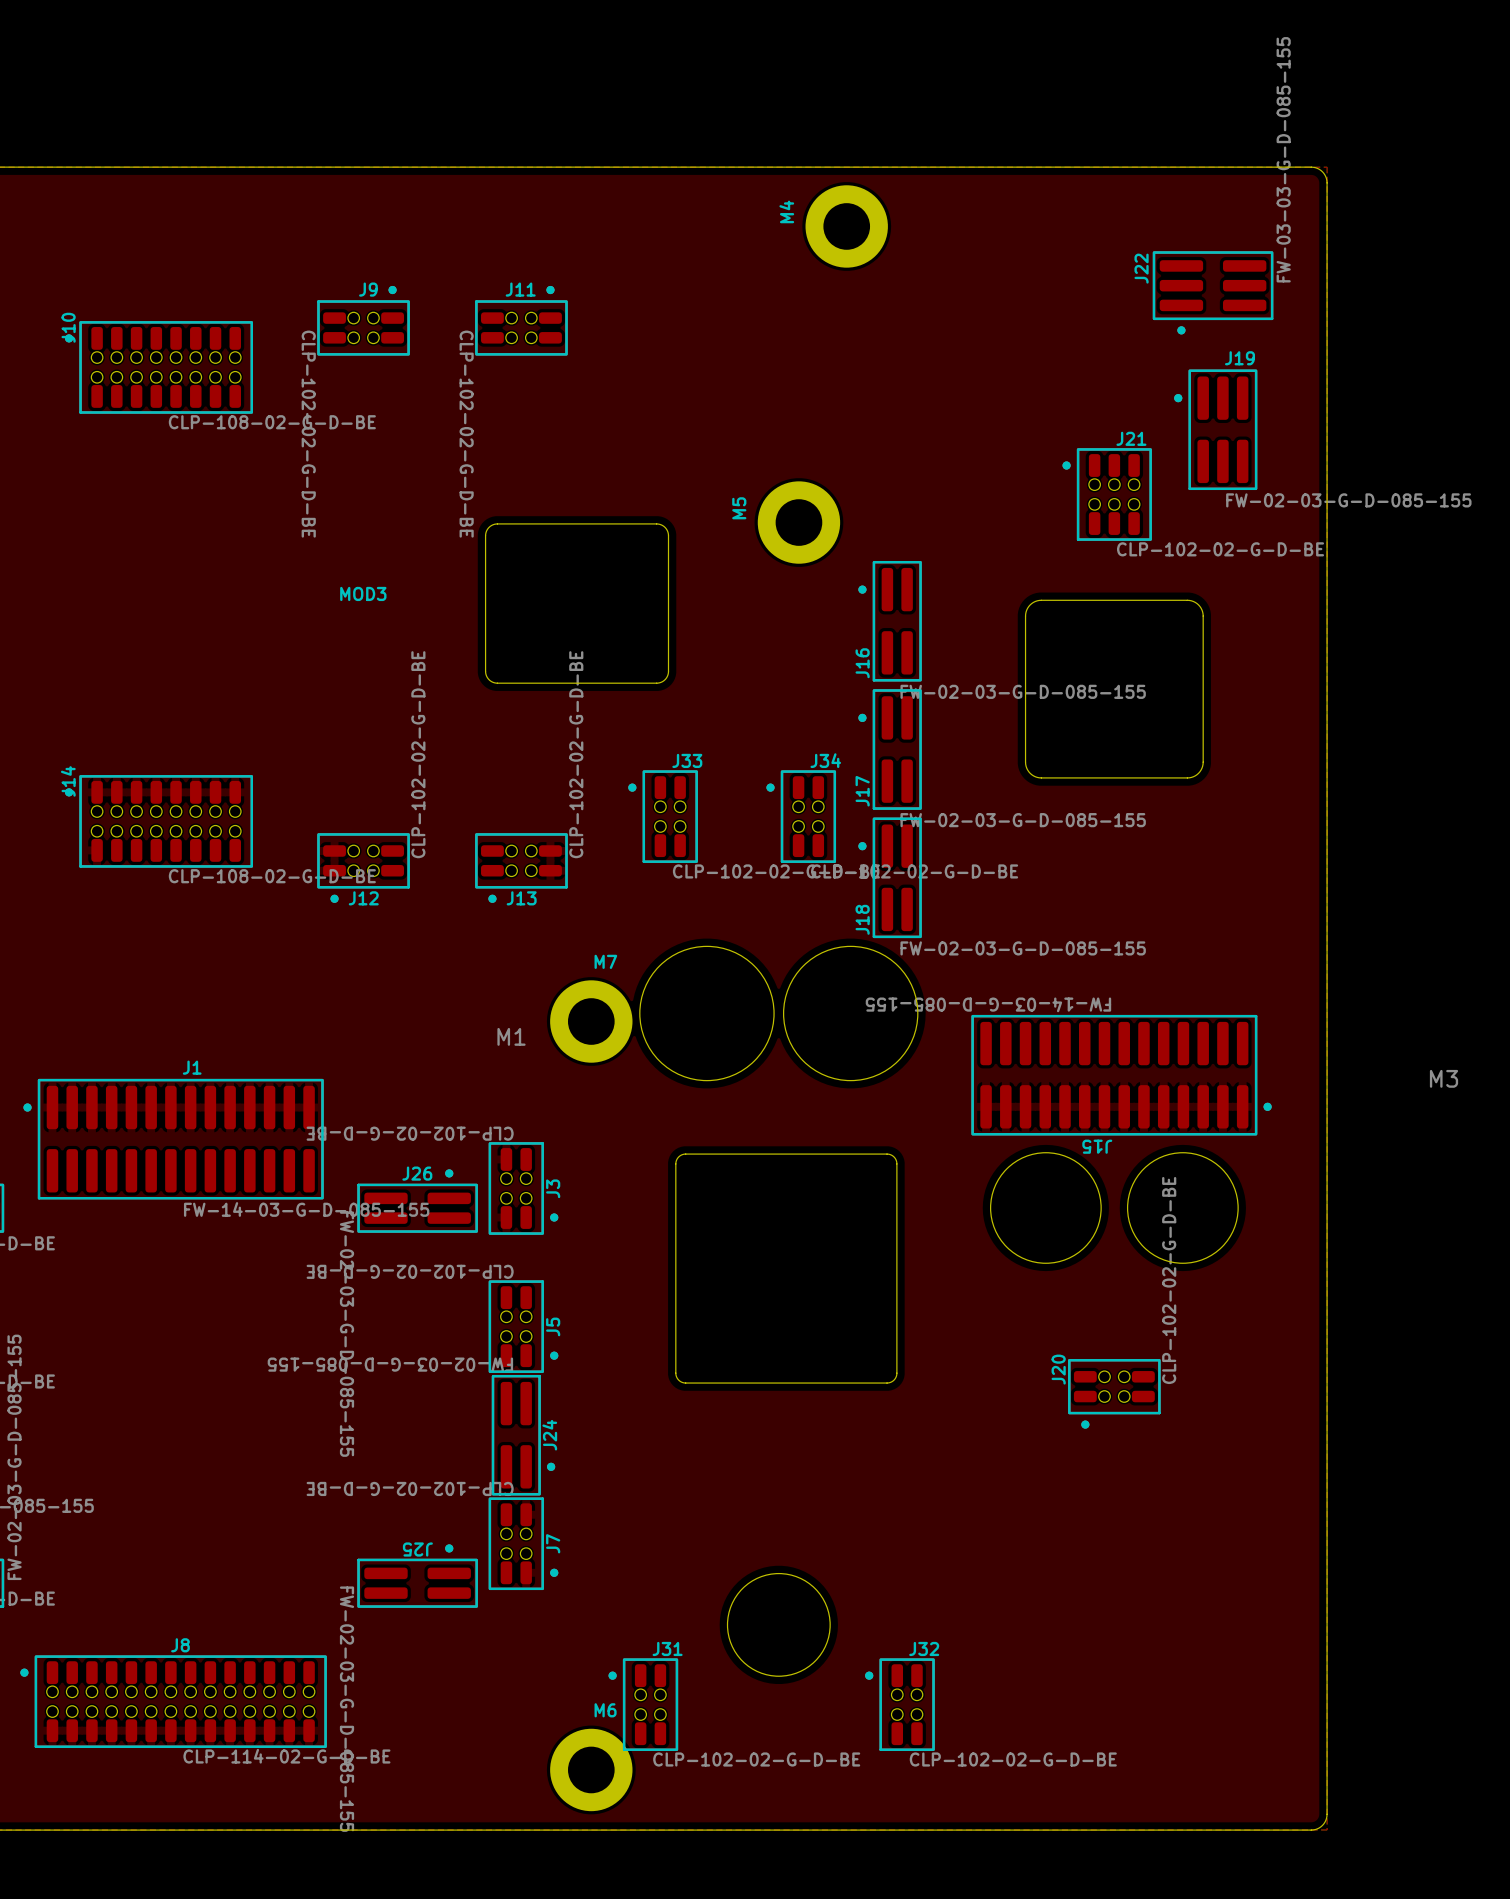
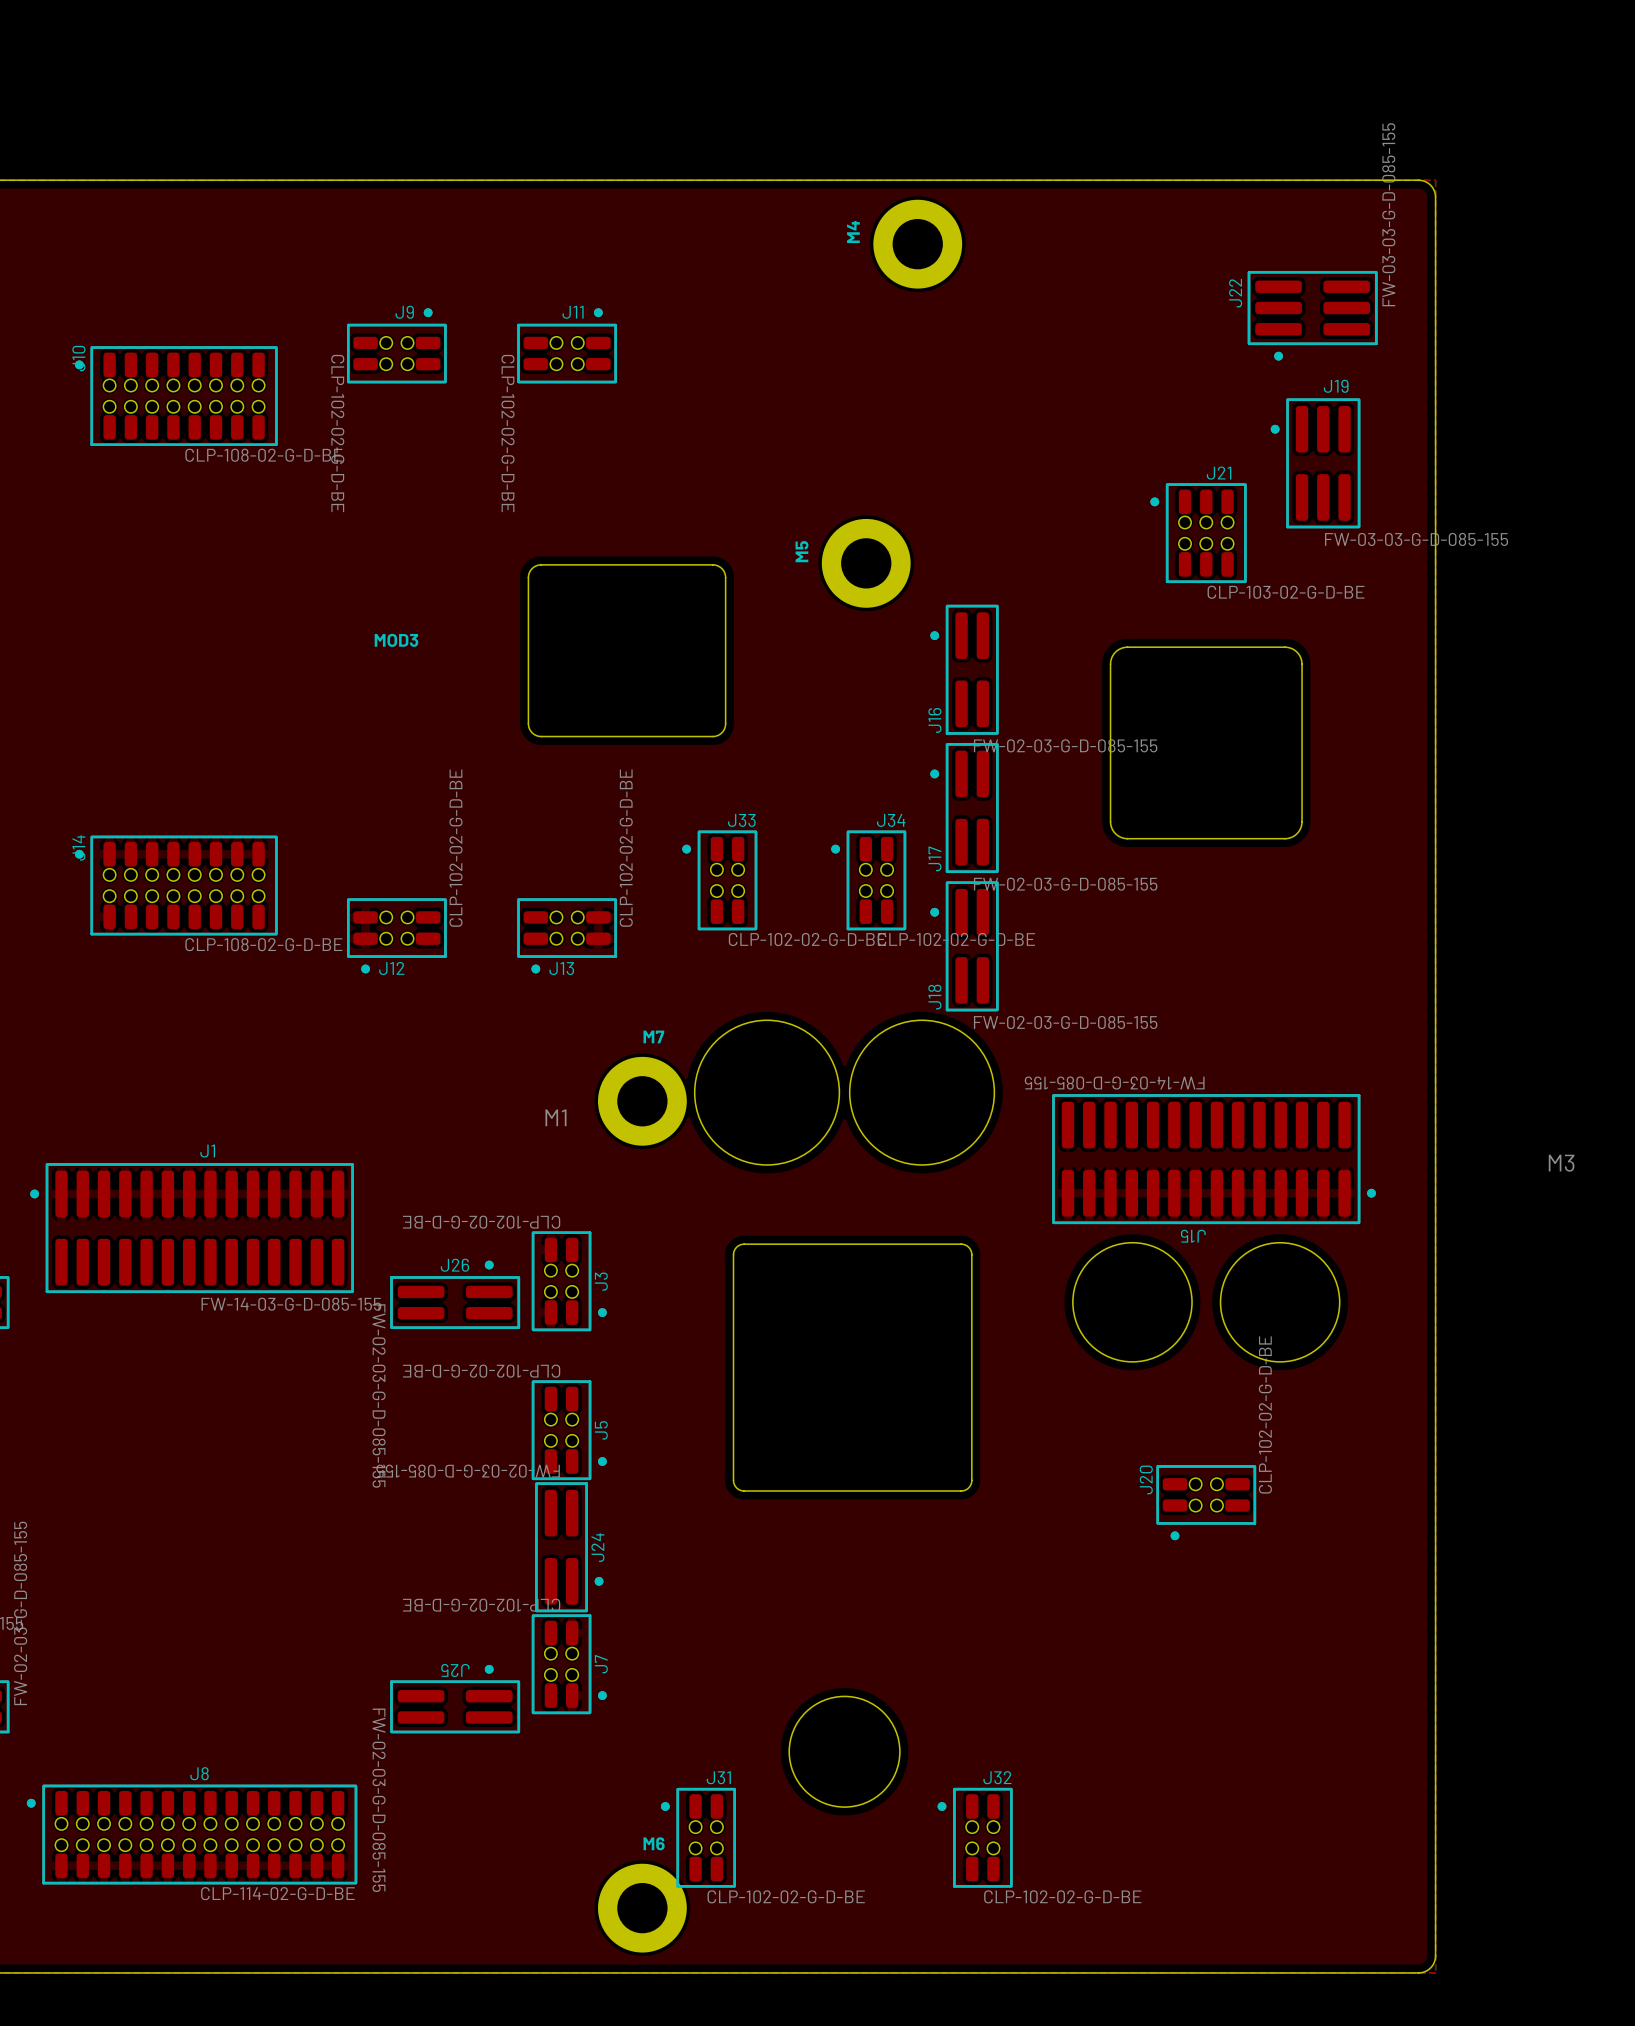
J19 value: FW-02-03-G-D-085-155 (1348, 500) -> FW-03-03-G-D-085-155 (1416, 539)
J21 value: CLP-102-02-G-D-BE (1220, 549) -> CLP-103-02-G-D-BE (1286, 592)

